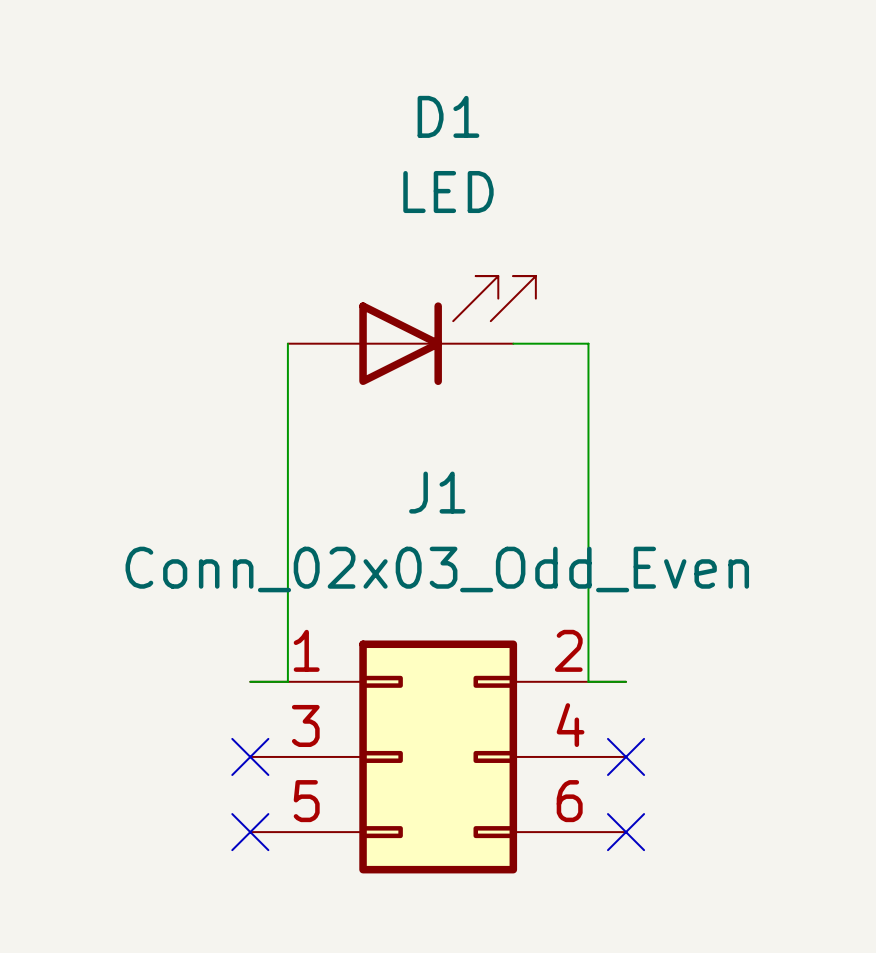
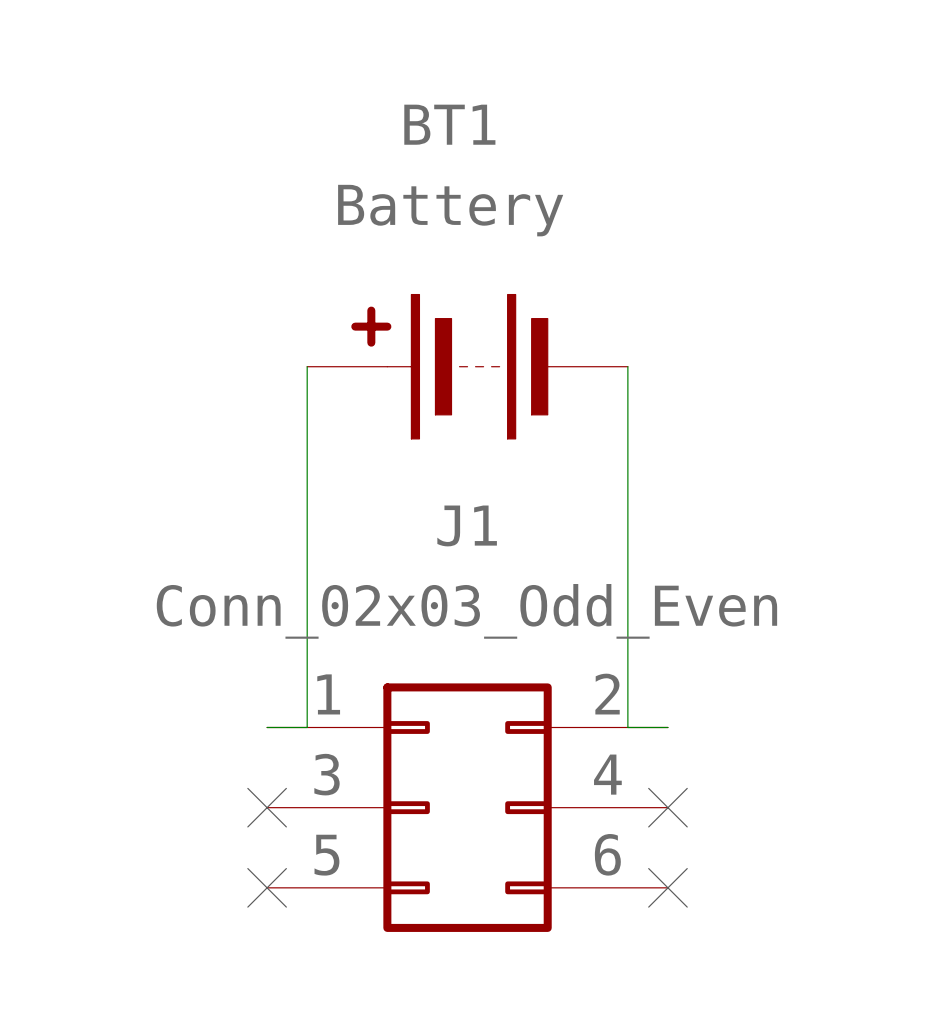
D1: LED (411, 330) -> none
BT1: none -> Battery (467, 366)

